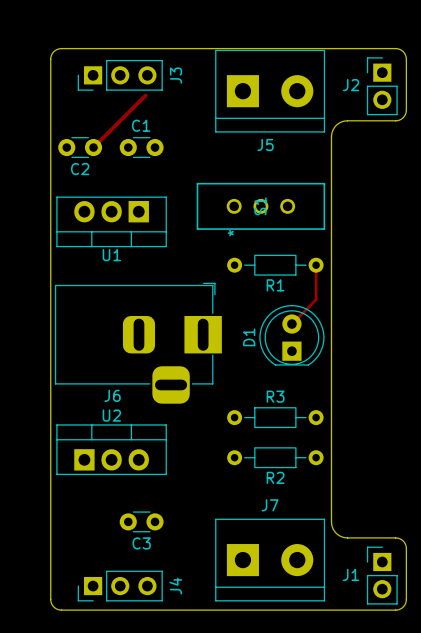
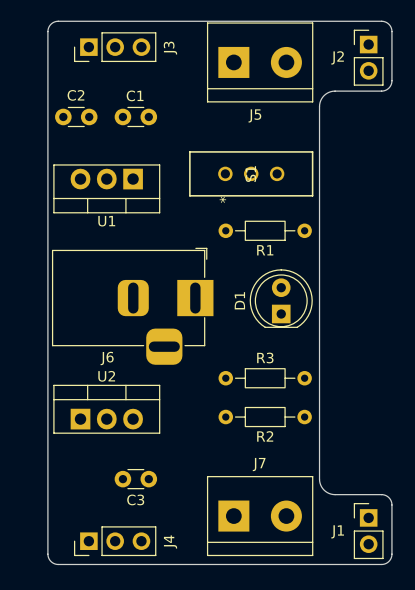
track: (145, 95) (93, 147) -> none
C2 name position: C2 (80, 169) -> C2 (75, 95)
track: (316, 265) (316, 299) (291, 324) -> none

